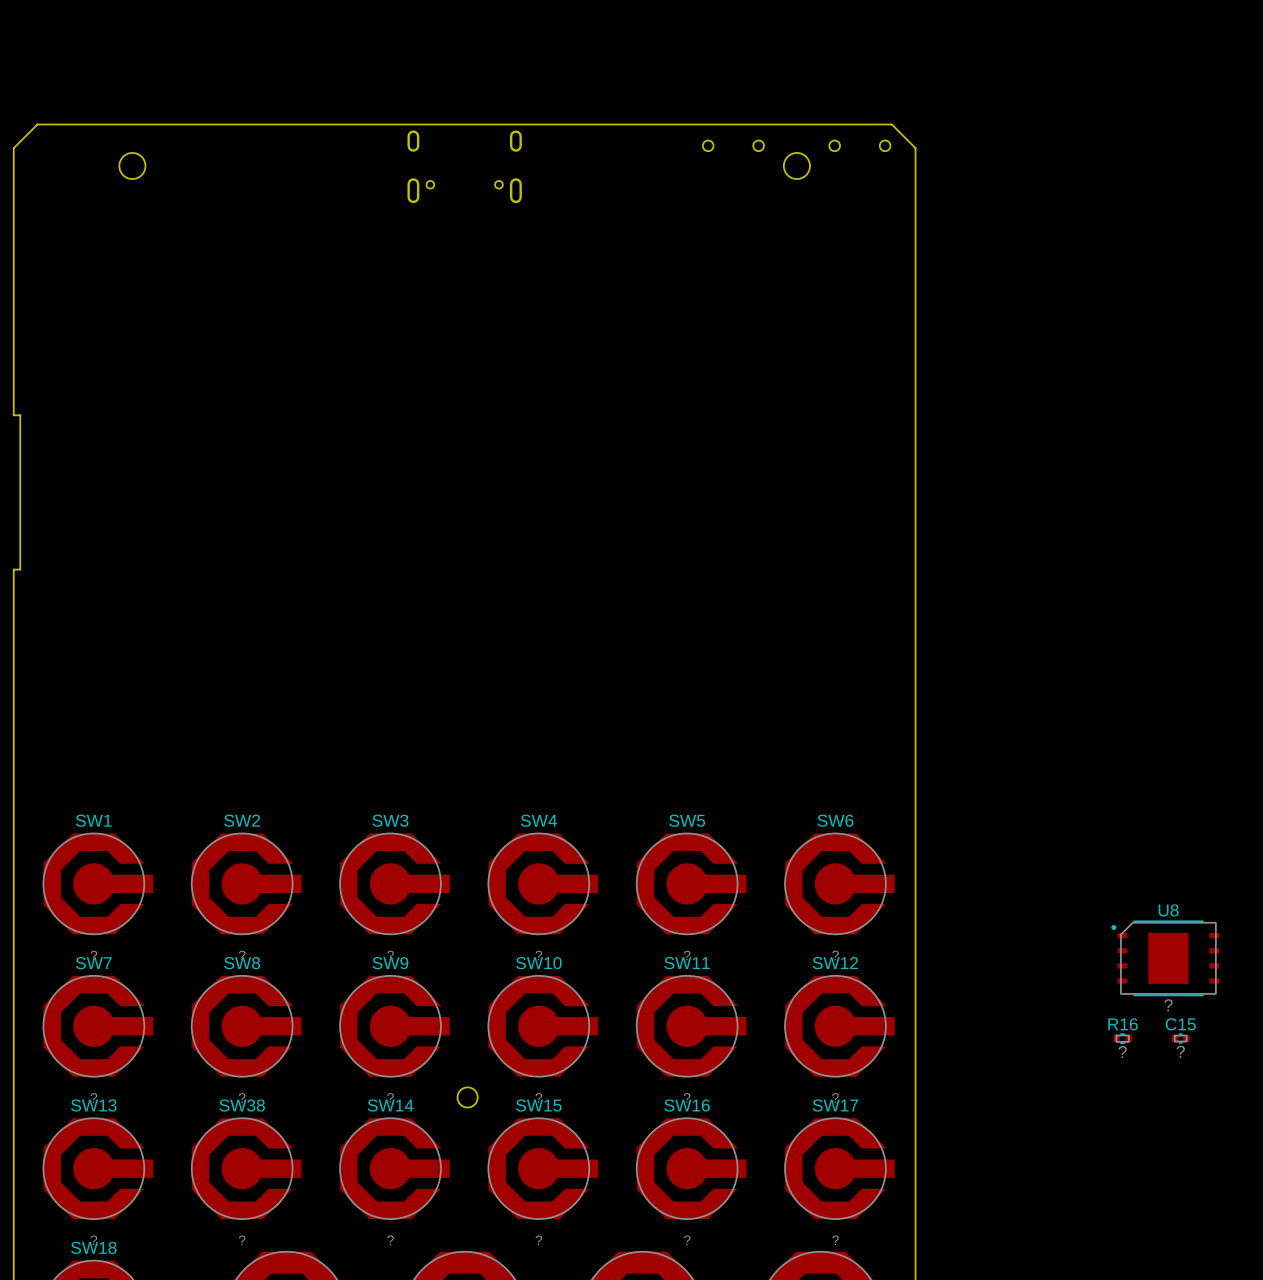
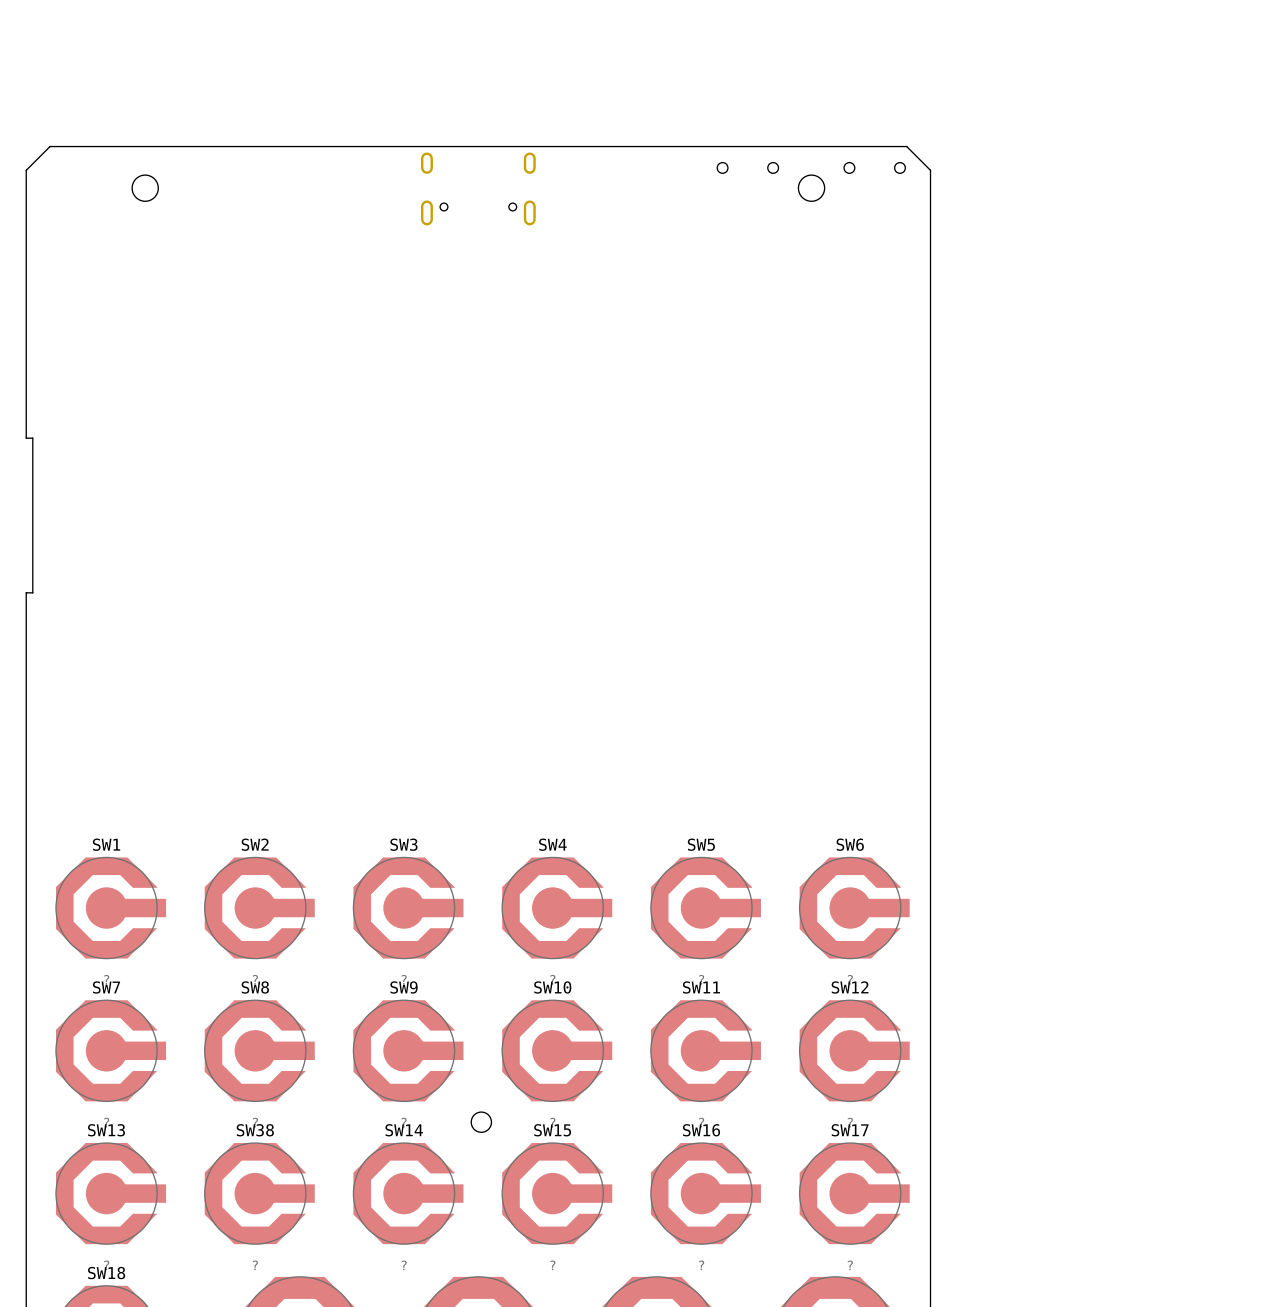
U8: ? (1165, 958) -> none
R16: ? (1122, 1038) -> none
C15: ? (1180, 1038) -> none

